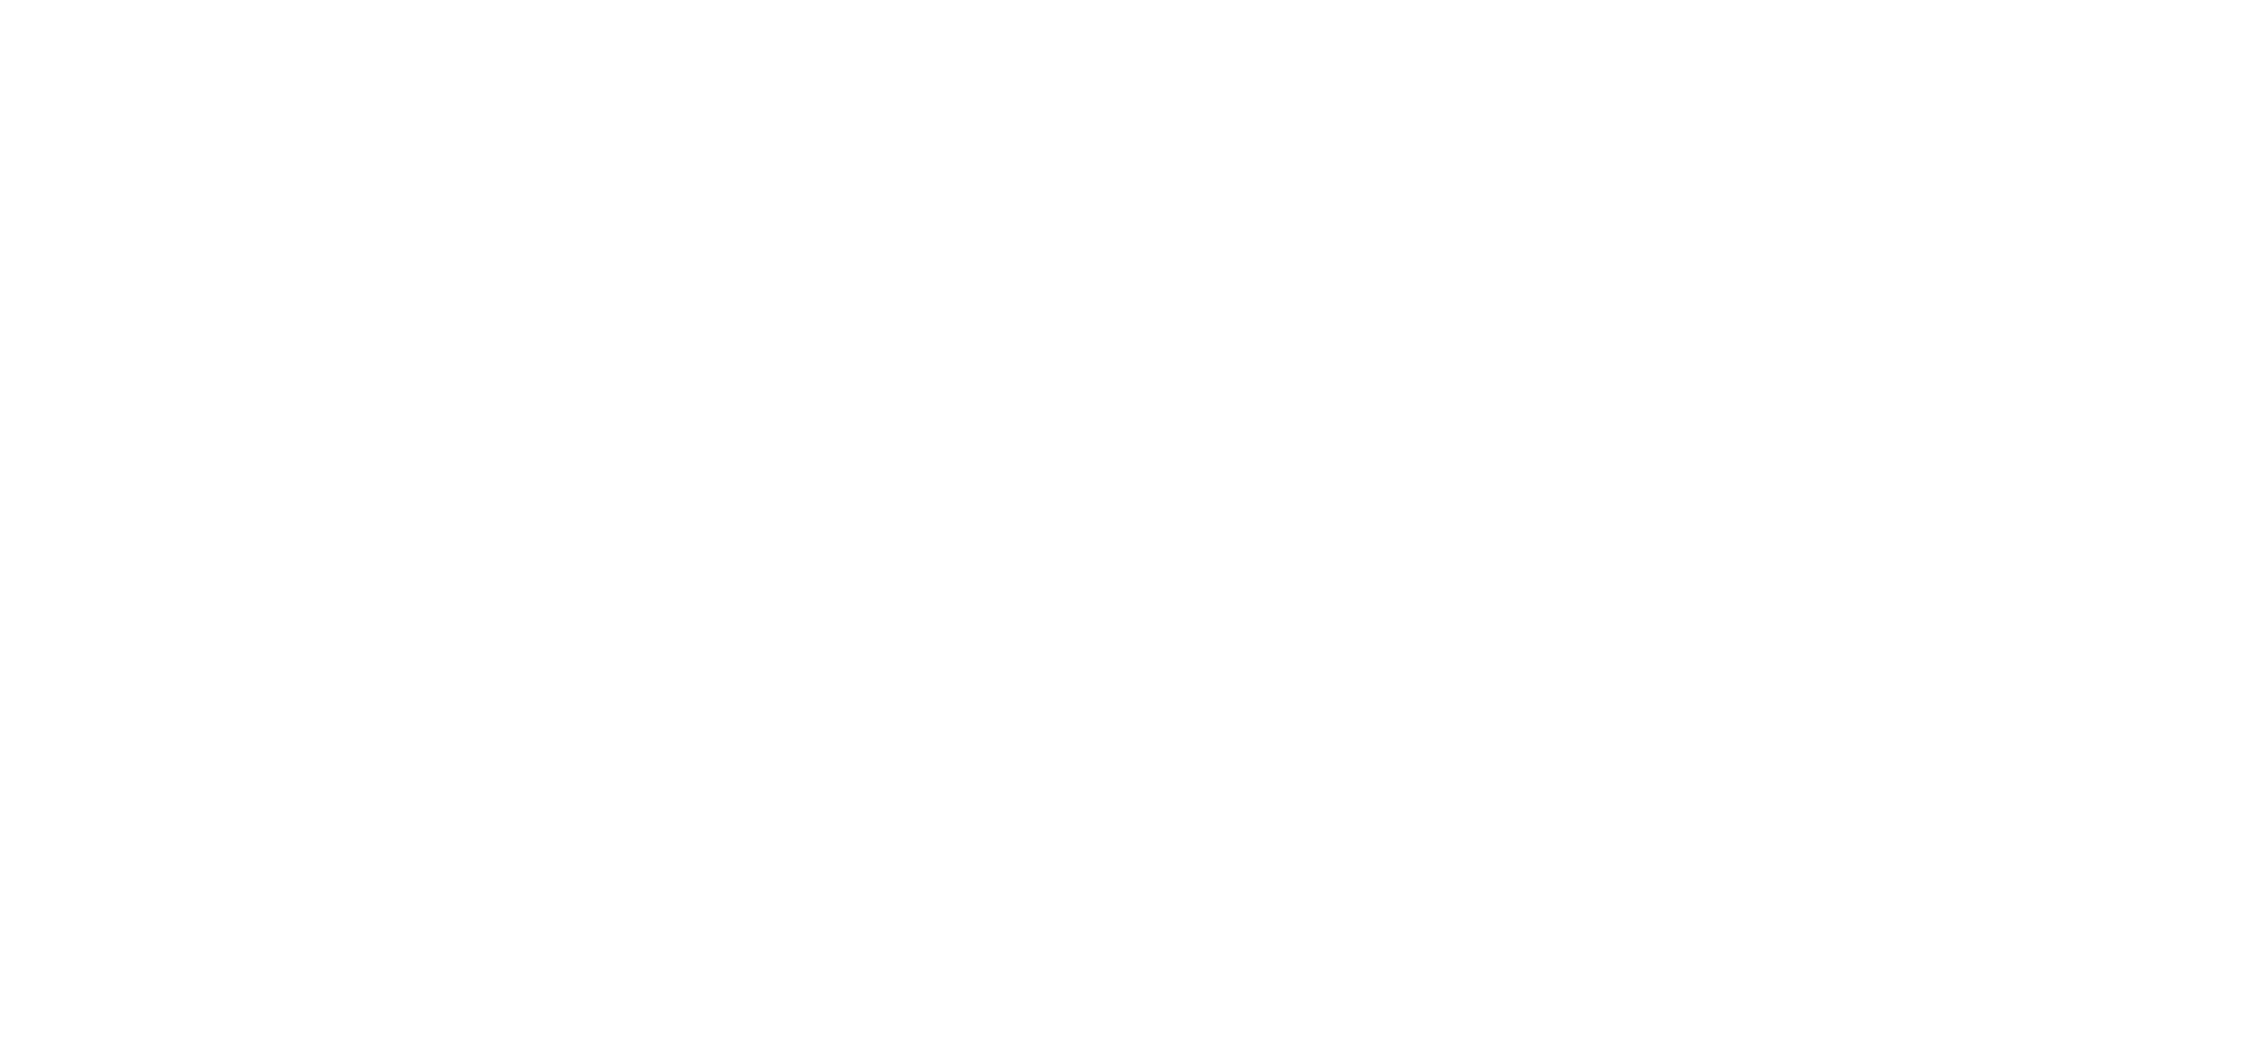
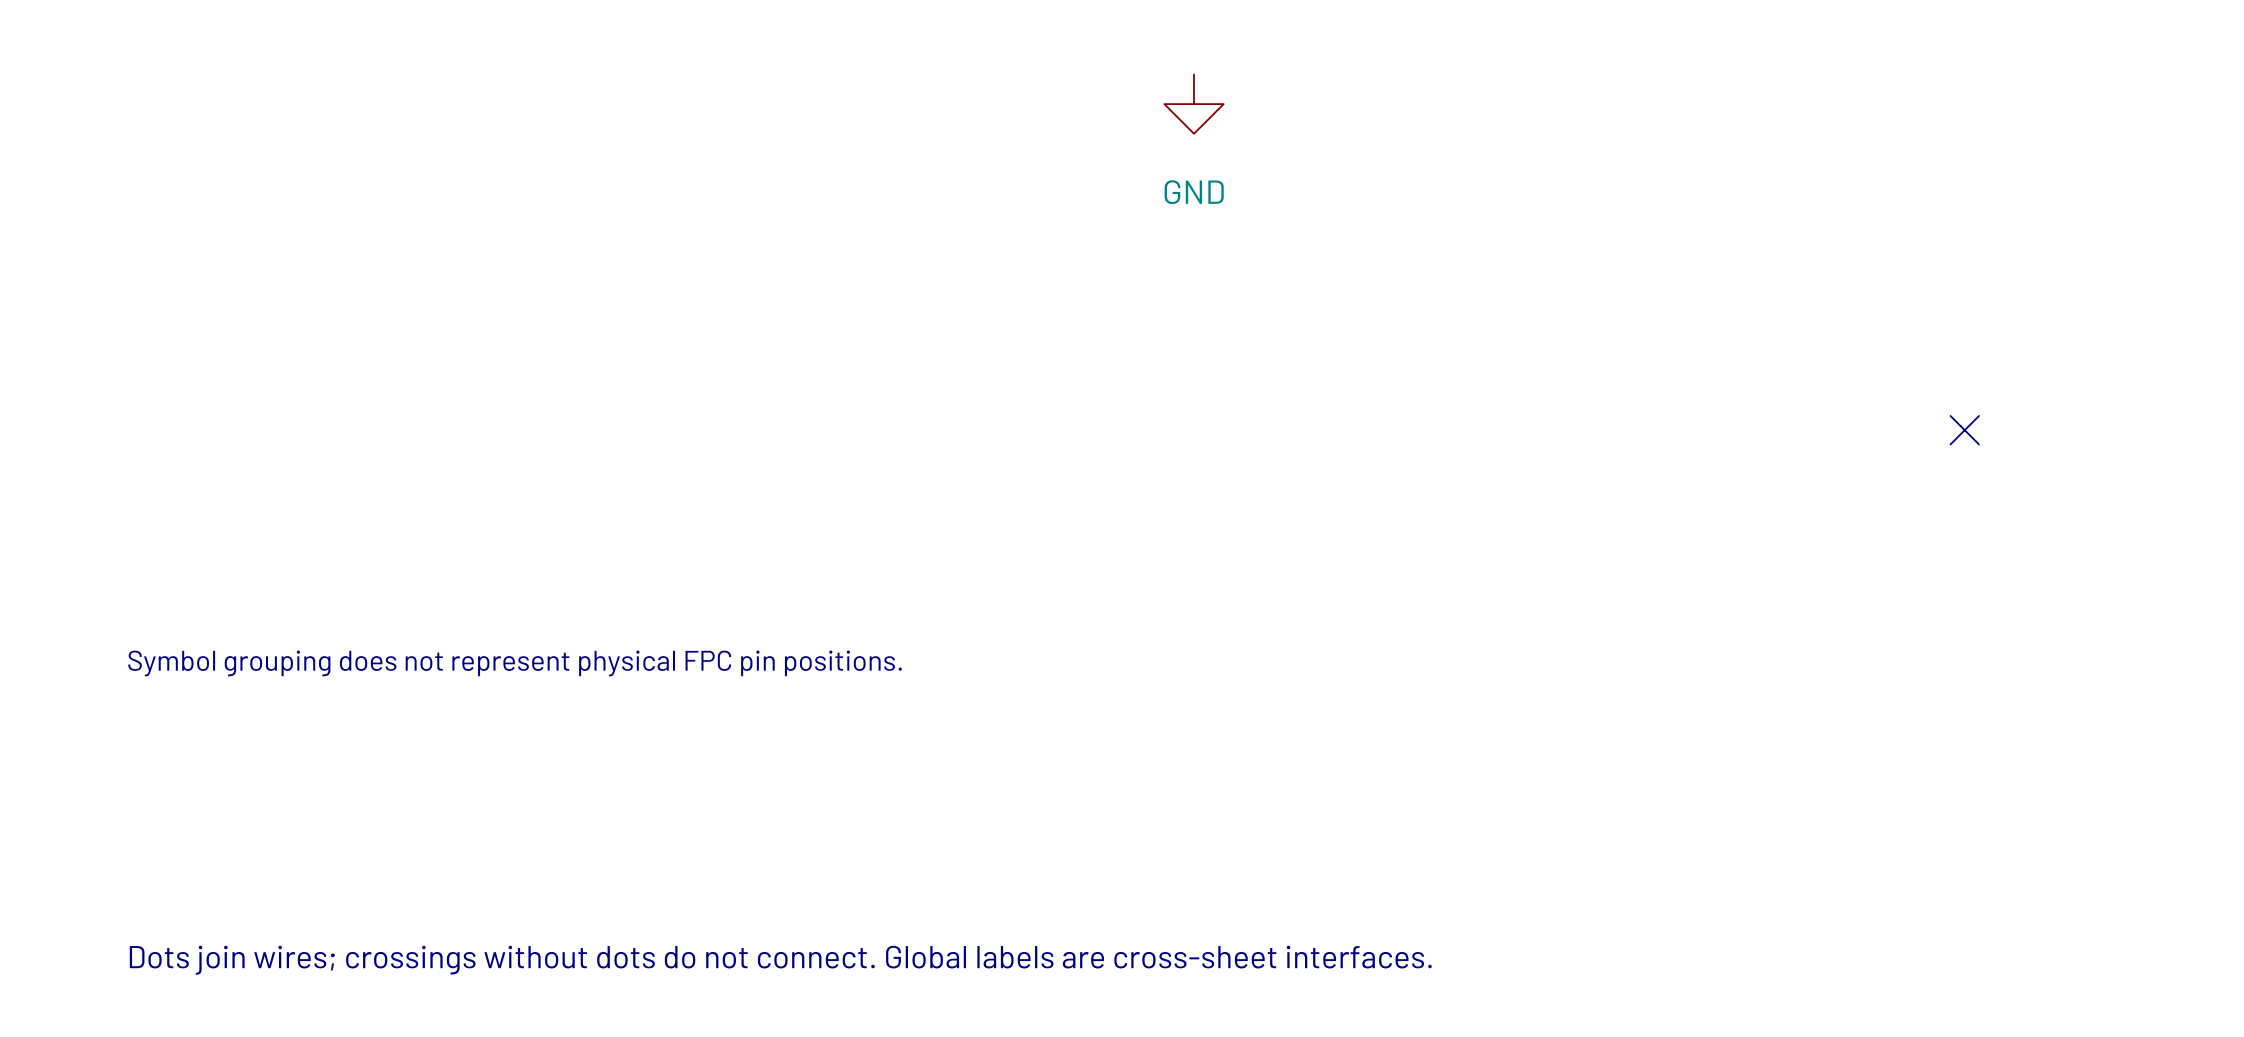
power symbol: none -> GND (1194, 104)
no-connect mark: none -> (1964, 430)
text: none -> Symbol grouping does not represent physical FPC pin positions. (515, 663)
text: none -> Dots join wires; crossings without dots do not connect. Global labels are cross-sheet interfaces. (780, 960)

